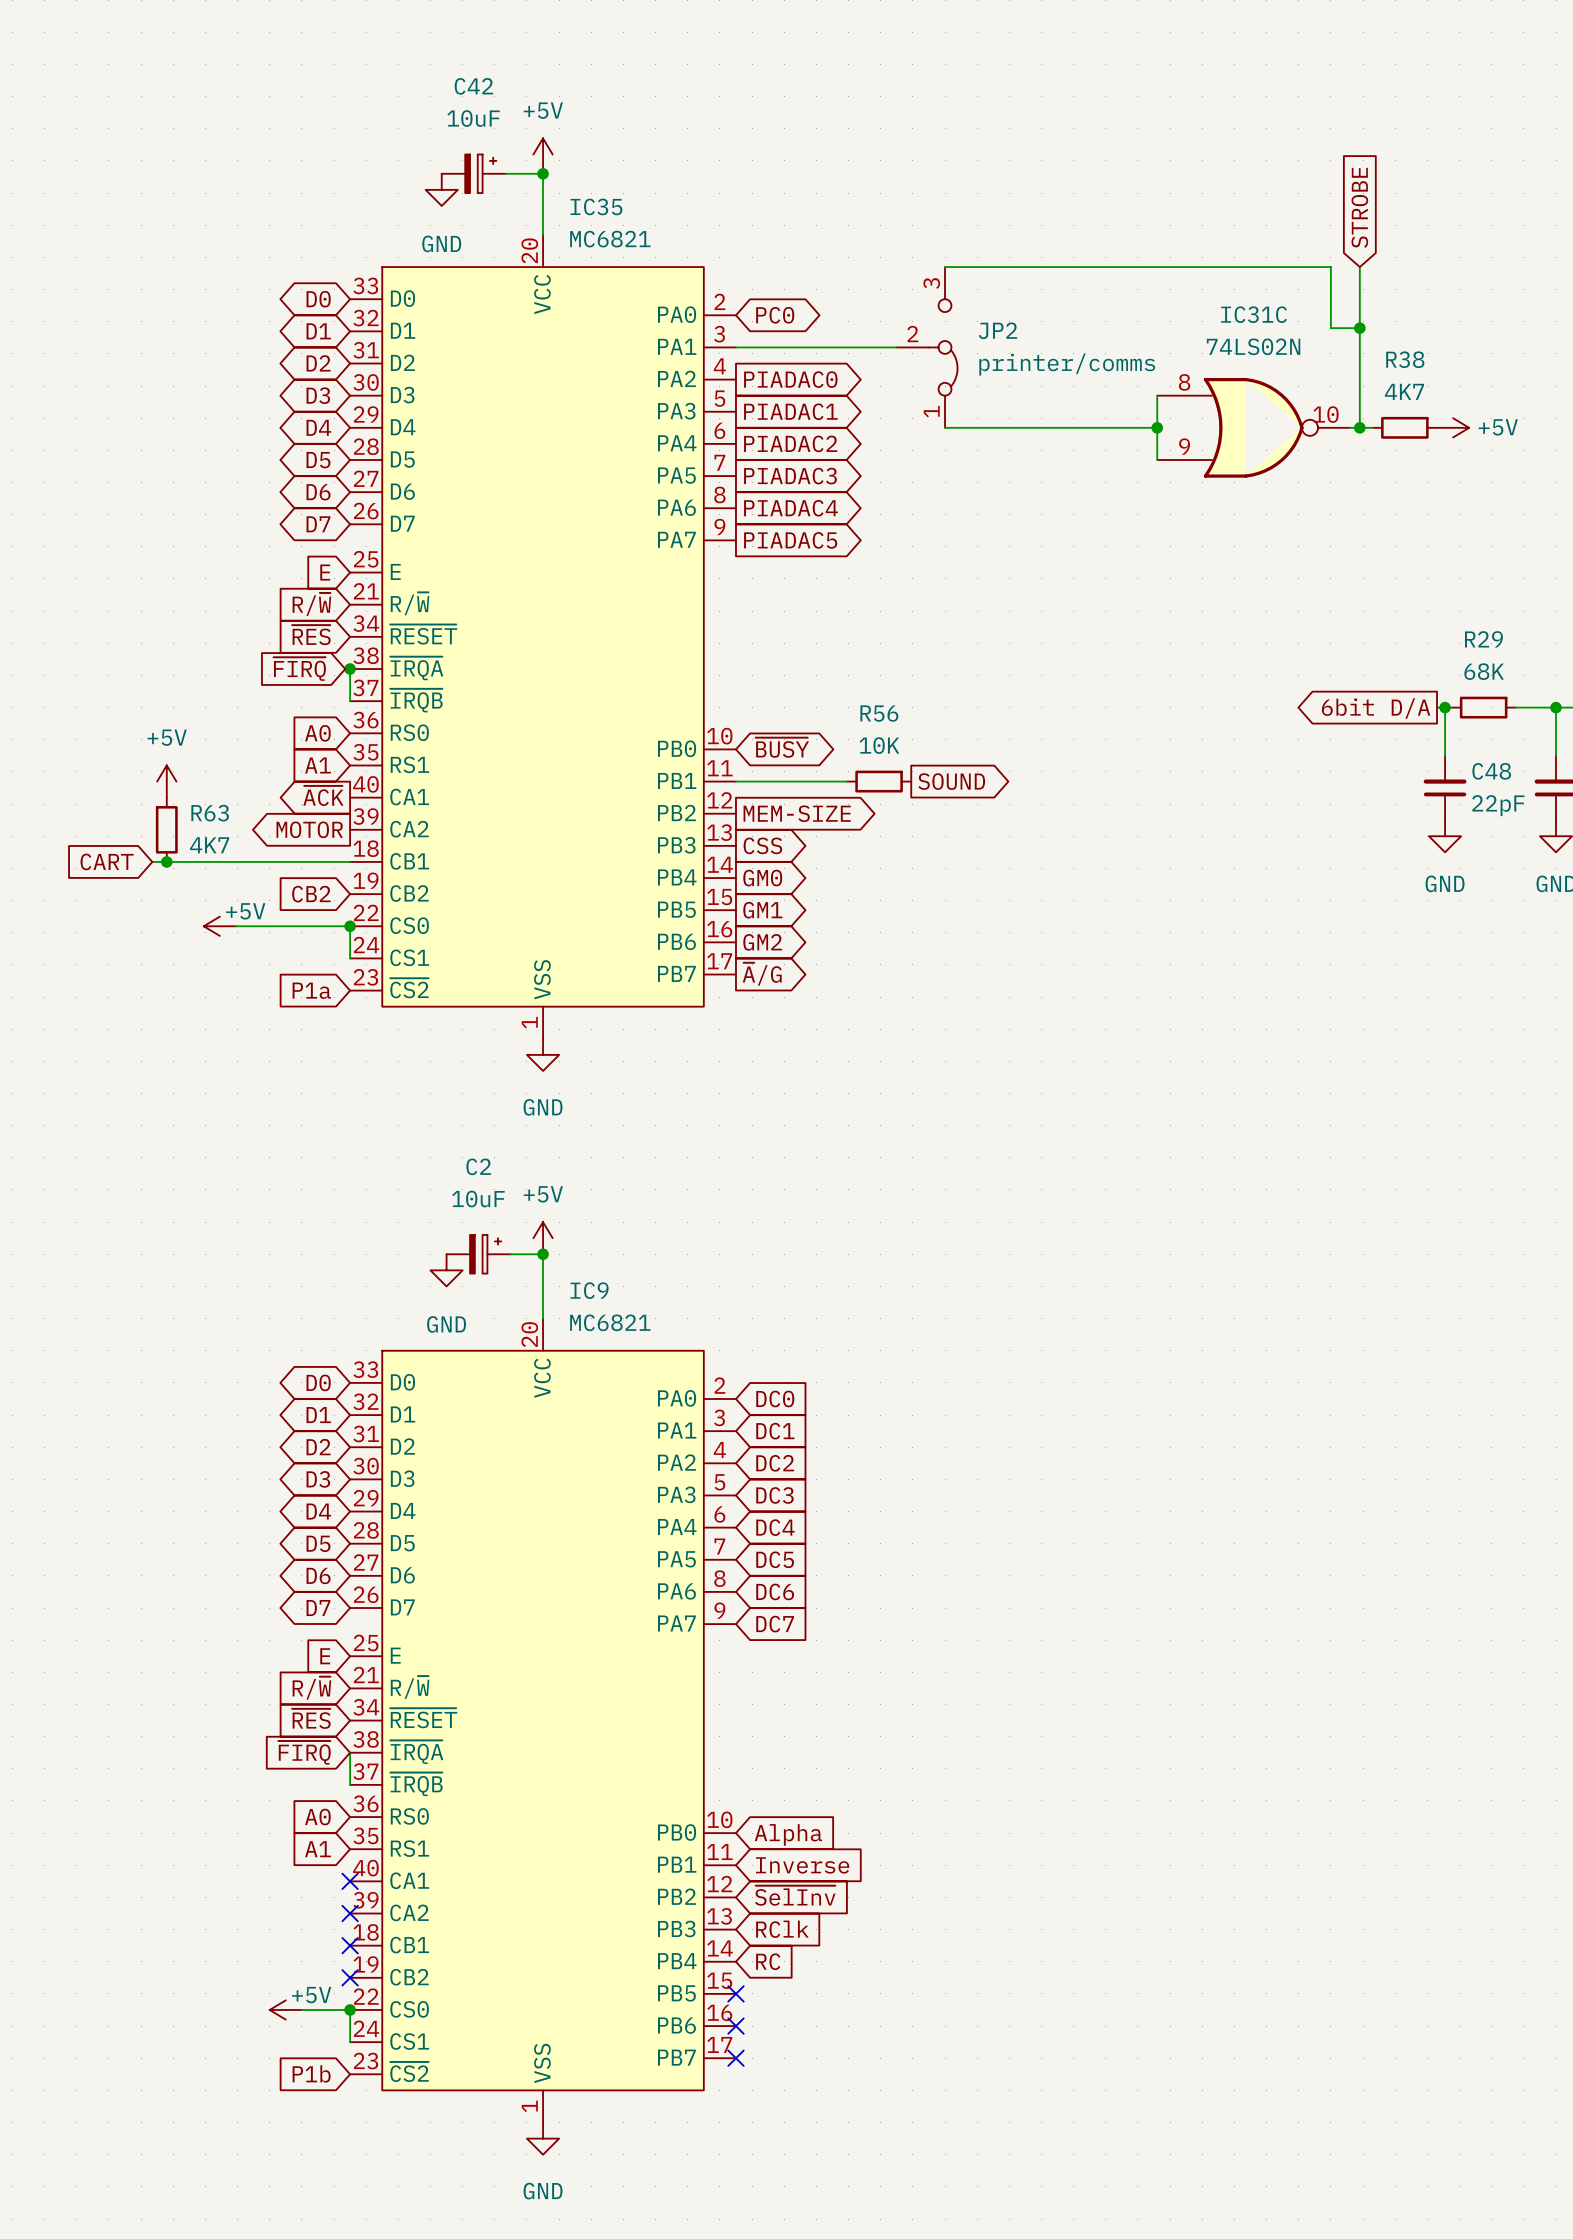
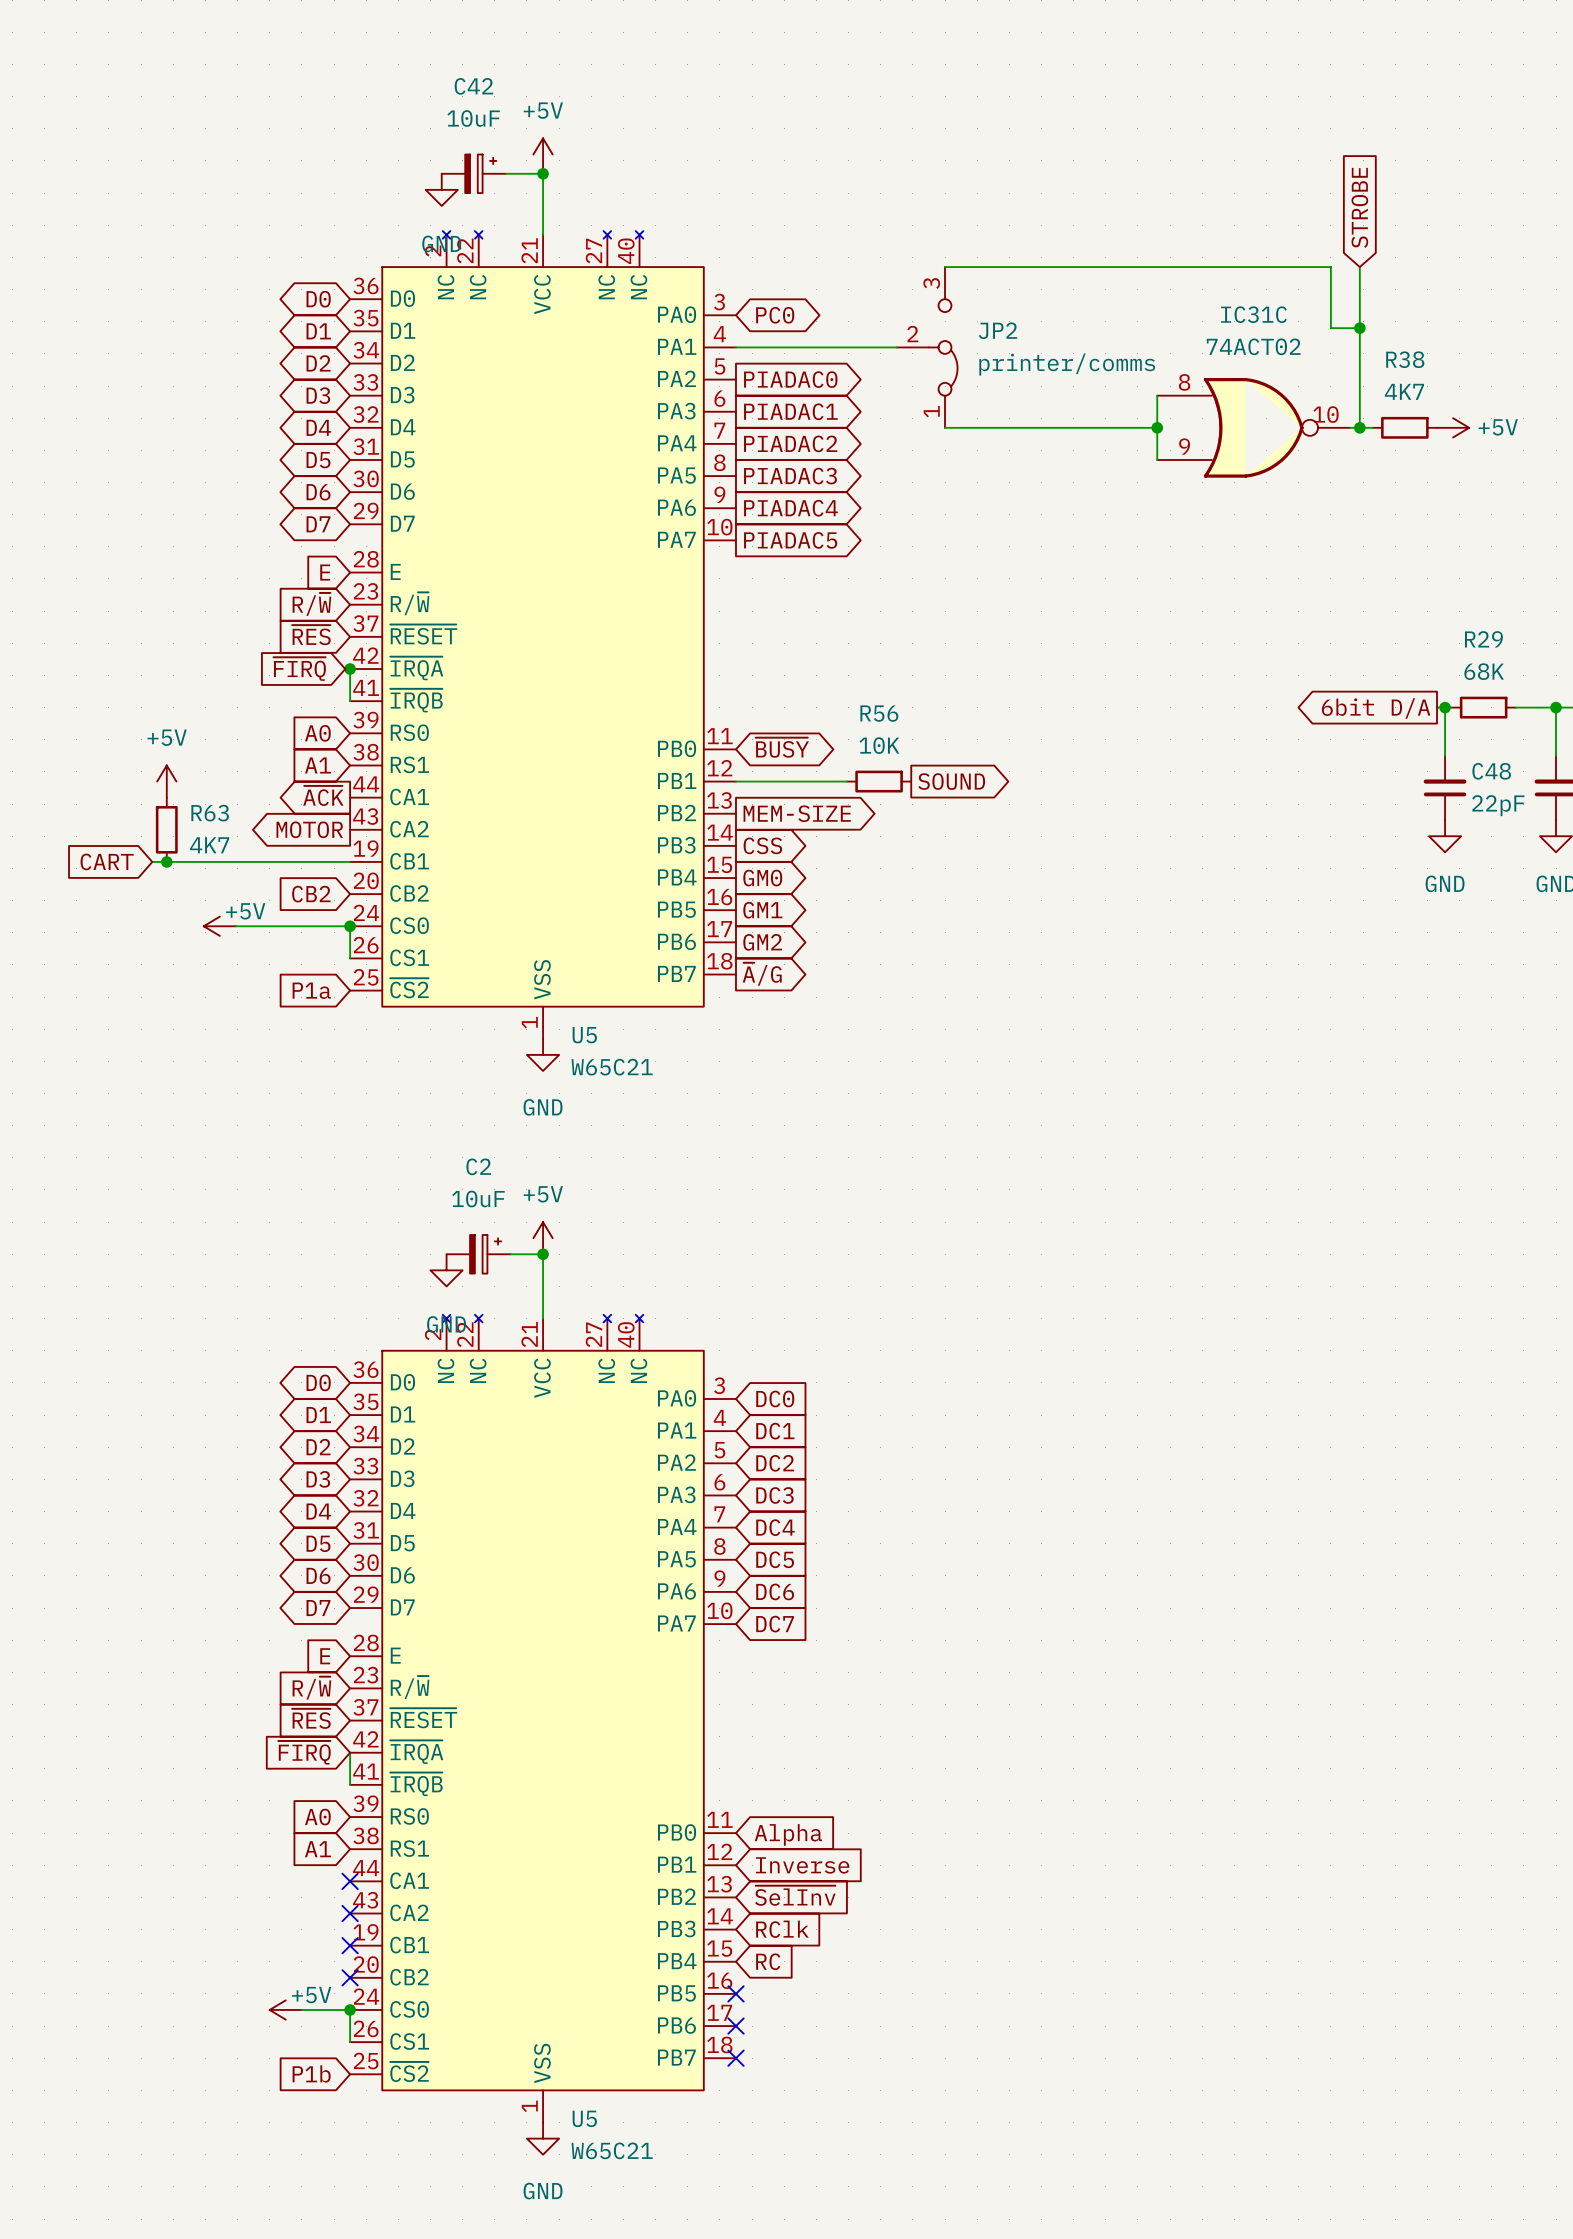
IC31C value: 74LS02N (1253, 346) -> 74ACT02 (1253, 346)
U5: none -> W65C21 (543, 634)
IC35: MC6821 (543, 636) -> none
U5: none -> W65C21 (543, 1718)
IC9: MC6821 (543, 1720) -> none

